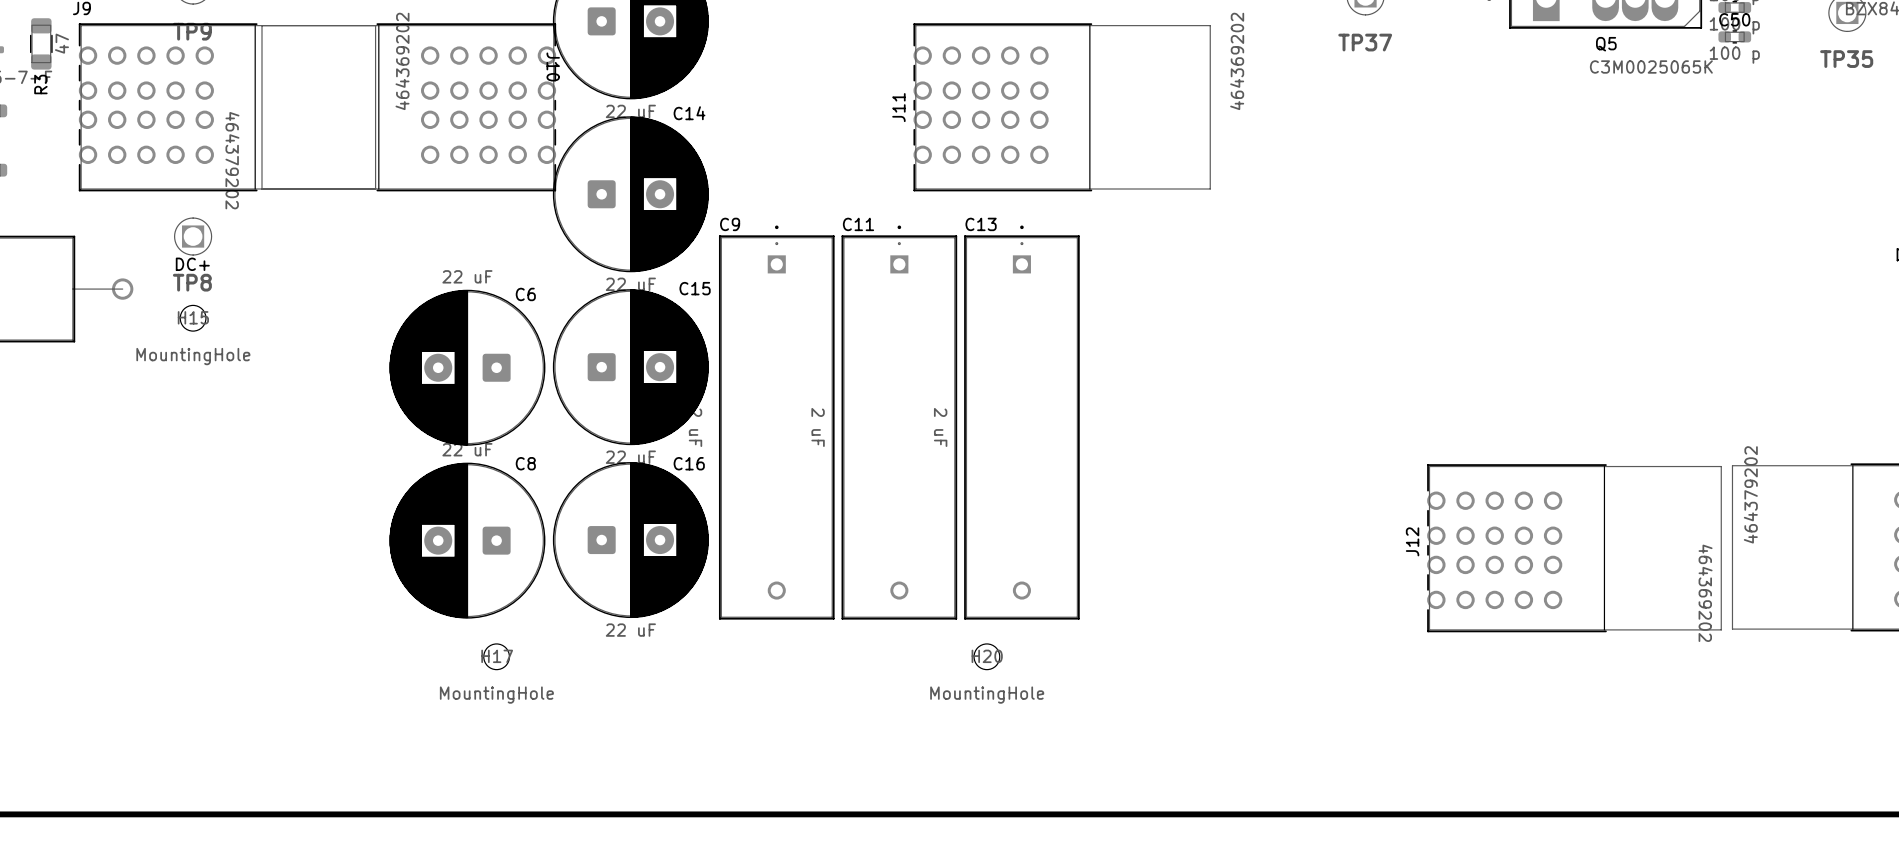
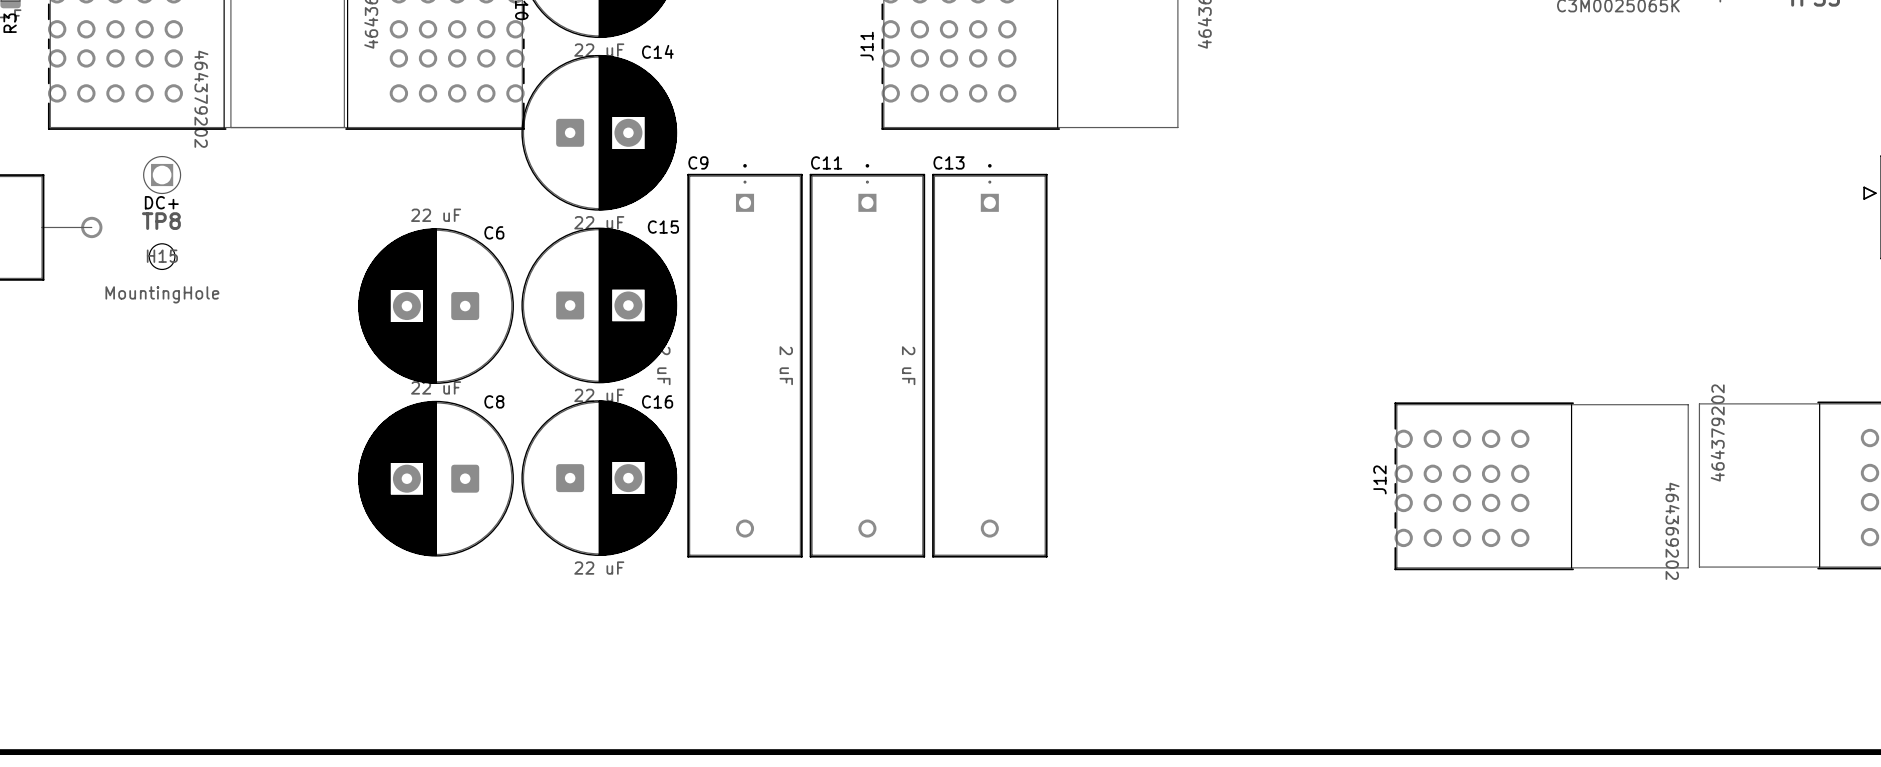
H17: MountingHole (496, 656) -> none
H20: MountingHole (986, 656) -> none

